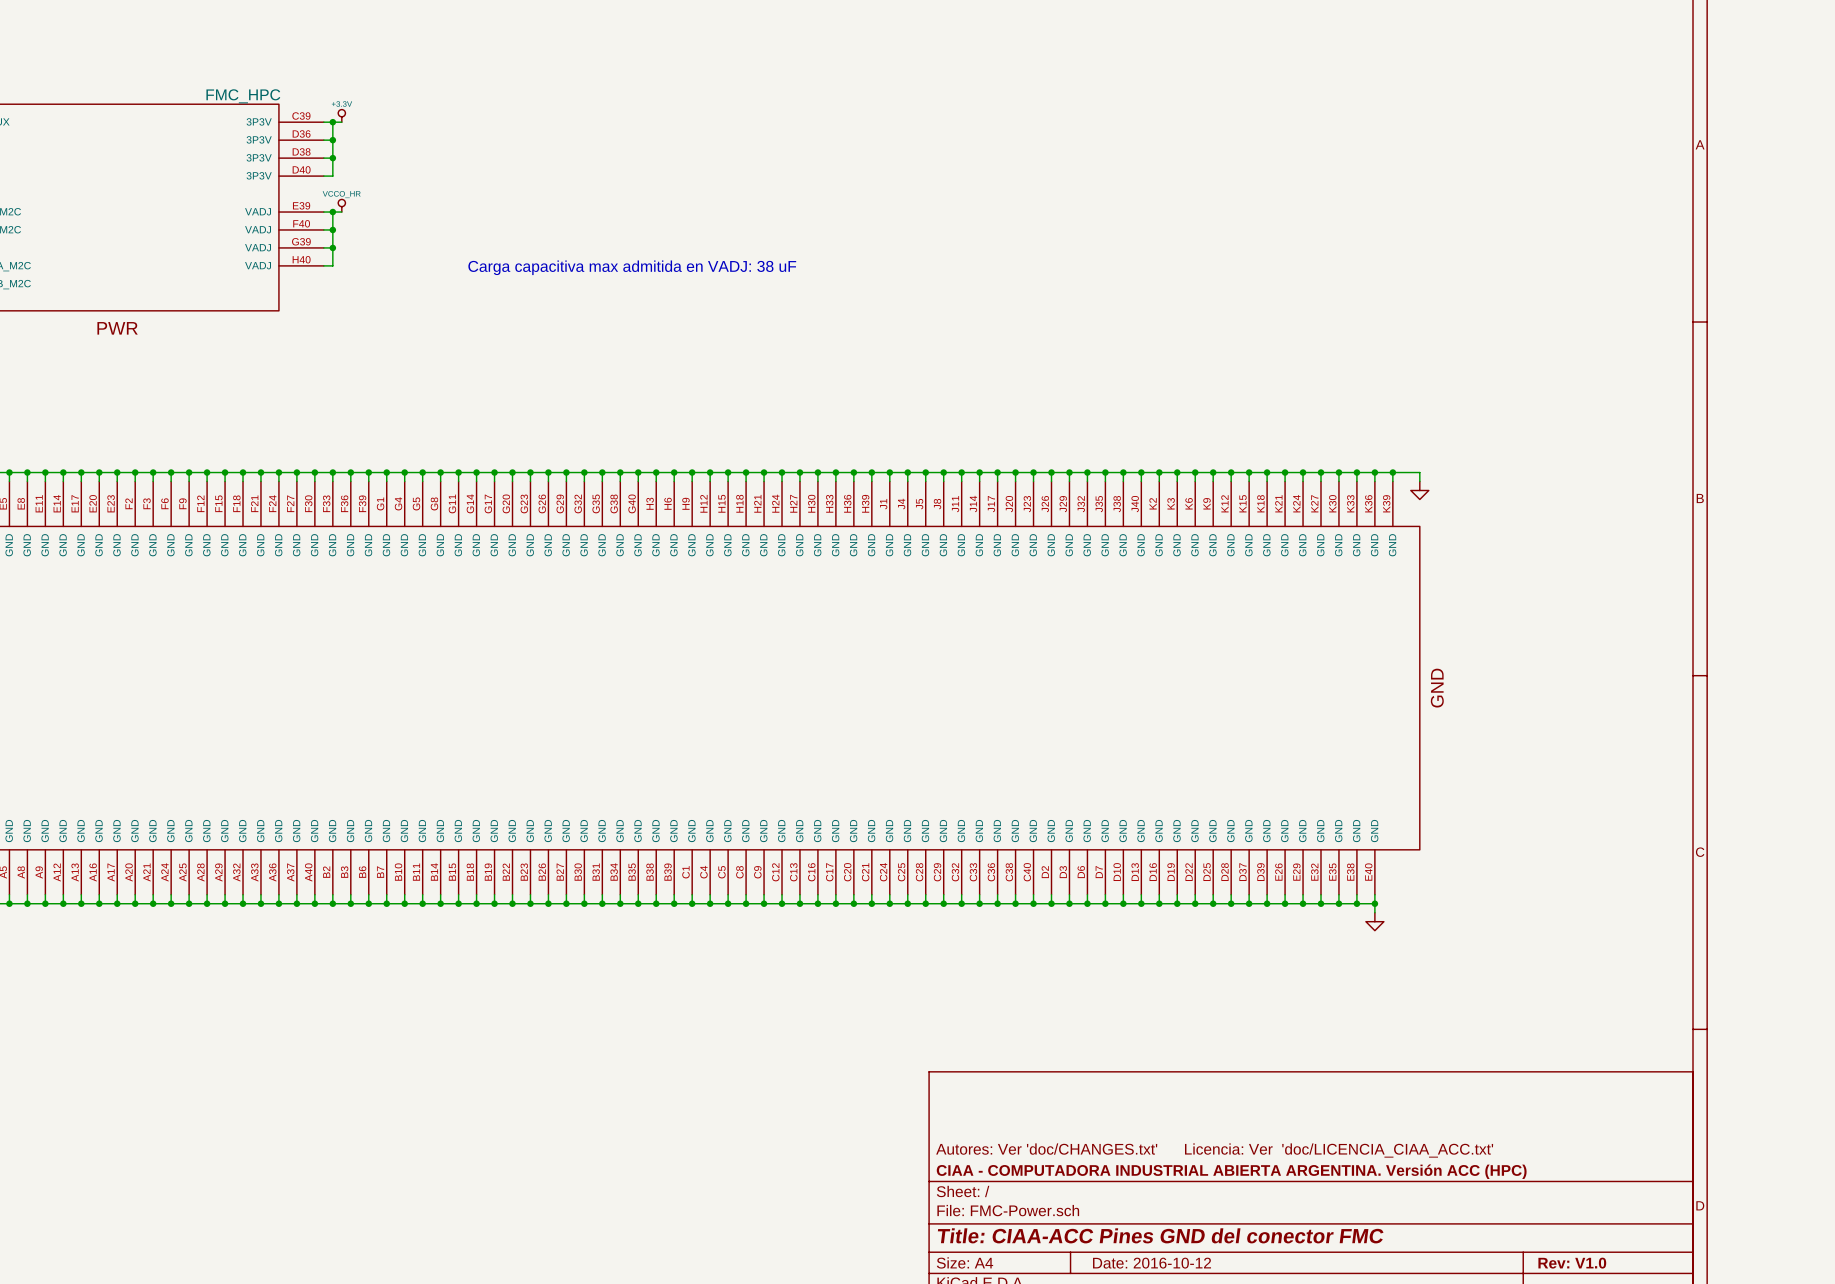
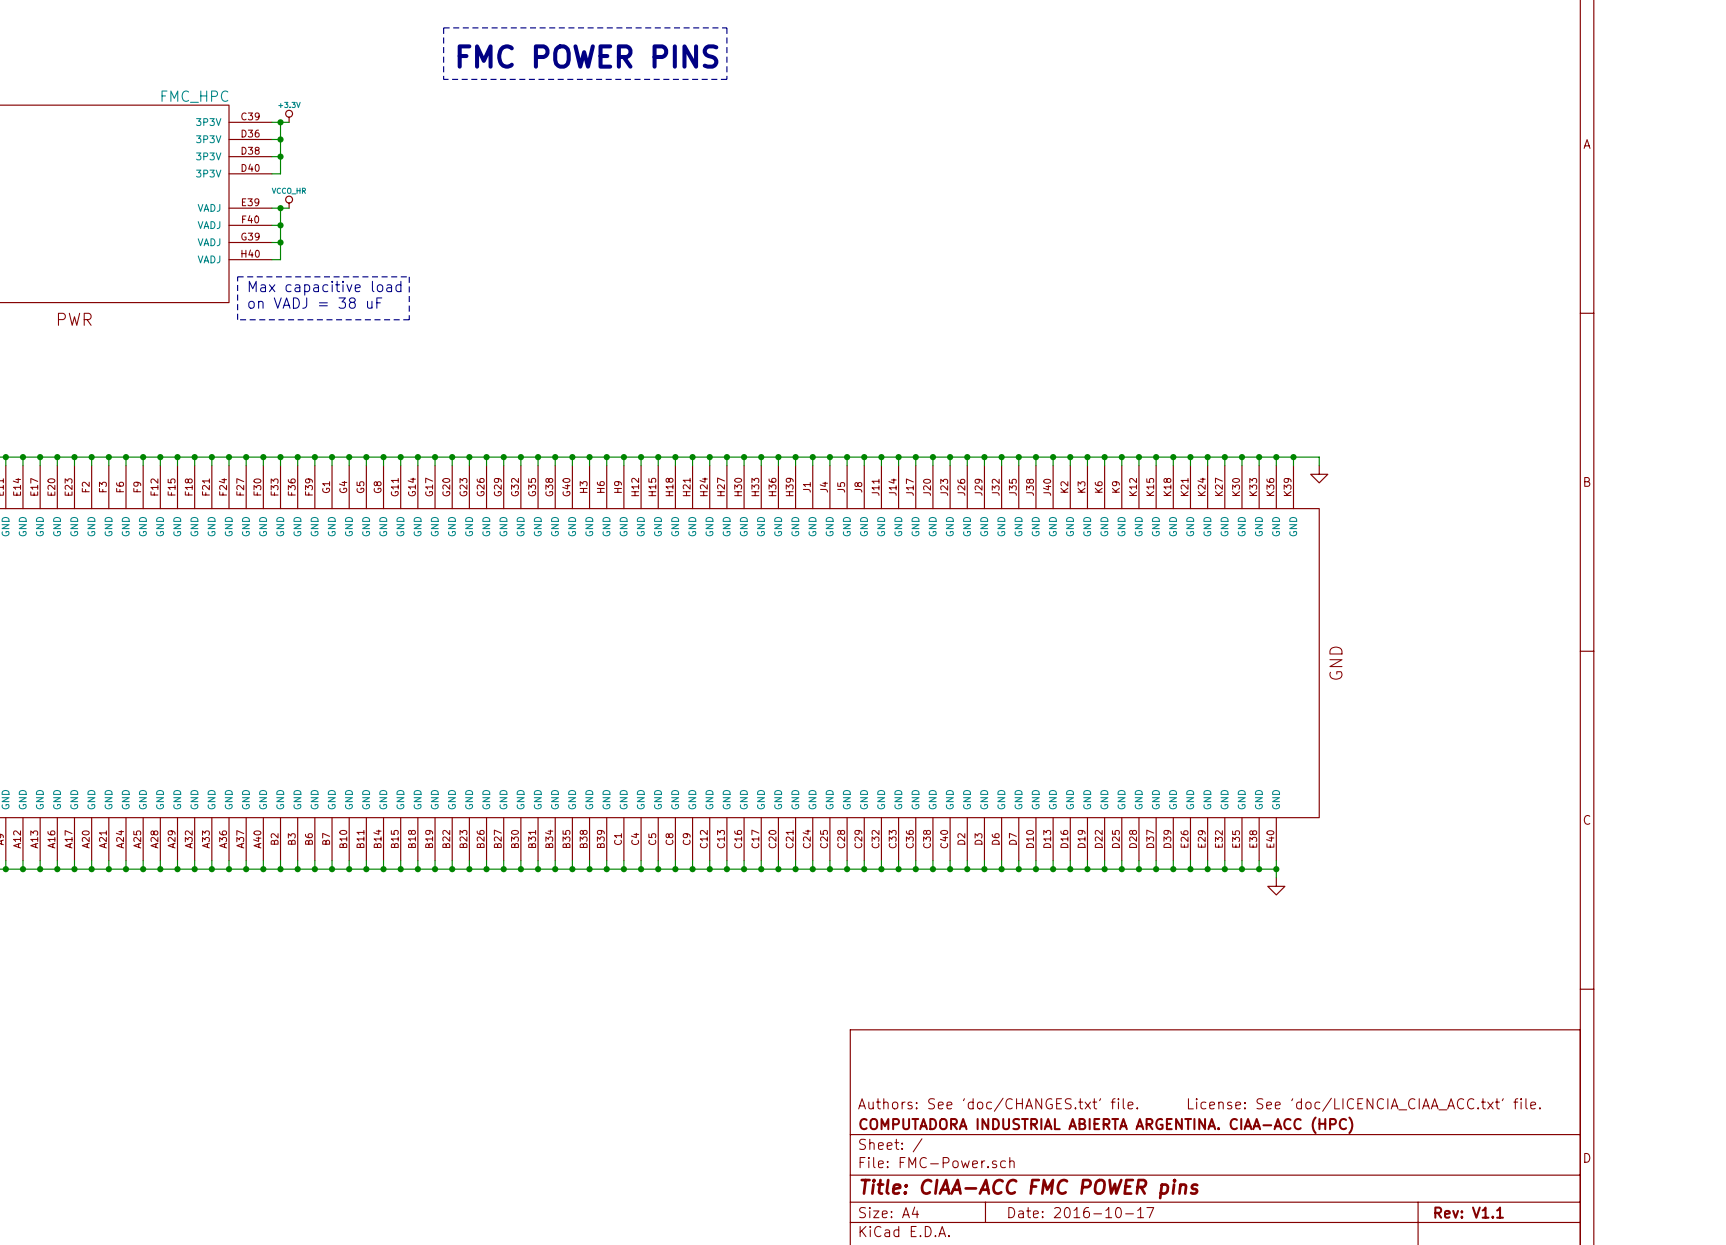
line: none -> (443, 27) (443, 79) (726, 79) (726, 27) (443, 27)
text: none -> FMC POWER PINS (588, 56)
text: Carga capacitiva max admitida en VADJ: 38 uF (632, 267) -> none
line: none -> (237, 276) (409, 276) (409, 319) (237, 319) (237, 276)
text: none -> Max capacitive load (325, 288)
text: none -> on VADJ = 38 uF (315, 303)
title block: Autores: Ver 'doc/CHANGES.txt' Licencia: Ver 'doc/LICENCIA_CIAA_ACC.txt' (1214, 1150) -> Authors: See 'doc/CHANGES.txt' file. License: See 'doc/LICENCIA_CIAA_ACC.txt' file. (1199, 1104)
title block: CIAA - COMPUTADORA INDUSTRIAL ABIERTA ARGENTINA. Versión ACC (HPC) (1231, 1171) -> COMPUTADORA INDUSTRIAL ABIERTA ARGENTINA. CIAA-ACC (HPC) (1106, 1125)
title block: Title: CIAA-ACC Pines GND del conector FMC (1160, 1235) -> Title: CIAA-ACC FMC POWER pins (1029, 1189)
title block: Date: 2016-10-12 (1152, 1263) -> Date: 2016-10-17 (1081, 1212)
title block: Rev: V1.0 (1572, 1263) -> Rev: V1.1 (1469, 1212)

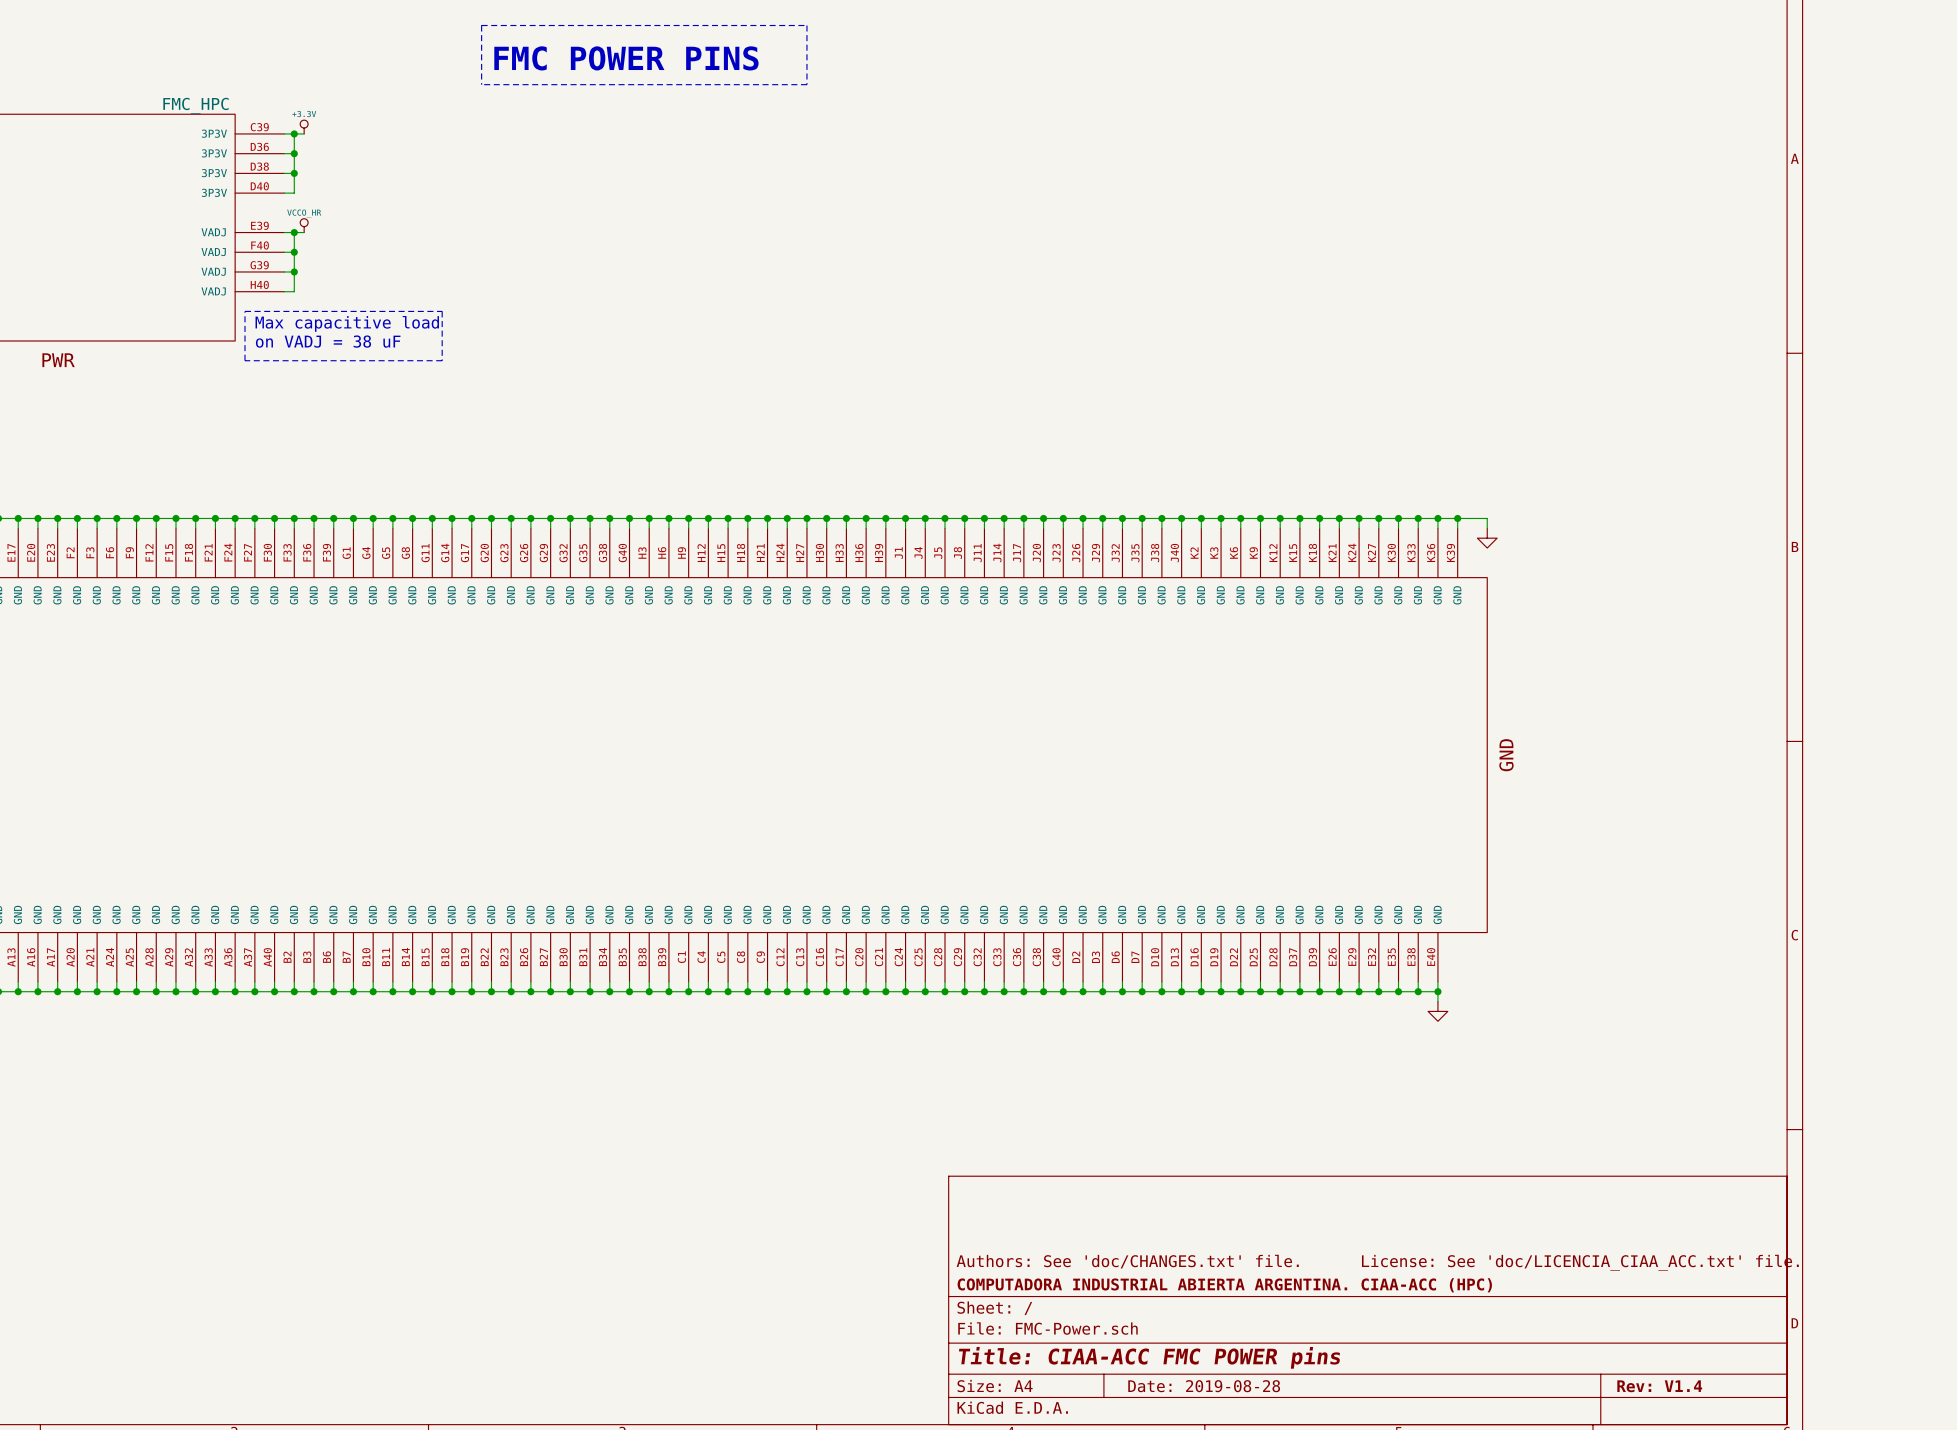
title block: Date: 2016-10-17 (1081, 1212) -> Date: 2019-08-28 (1204, 1386)
title block: Rev: V1.1 (1469, 1212) -> Rev: V1.4 (1659, 1386)

